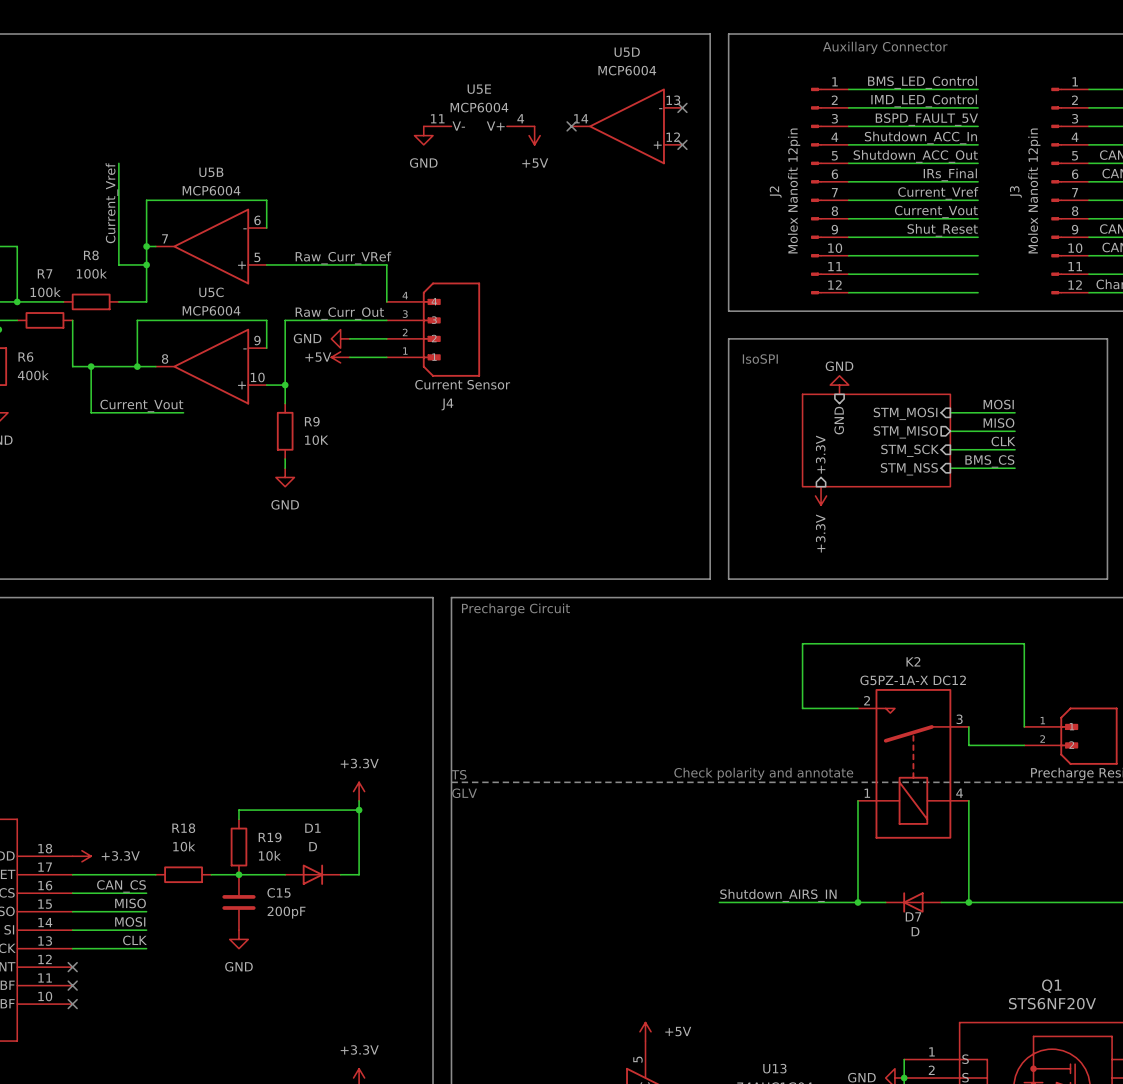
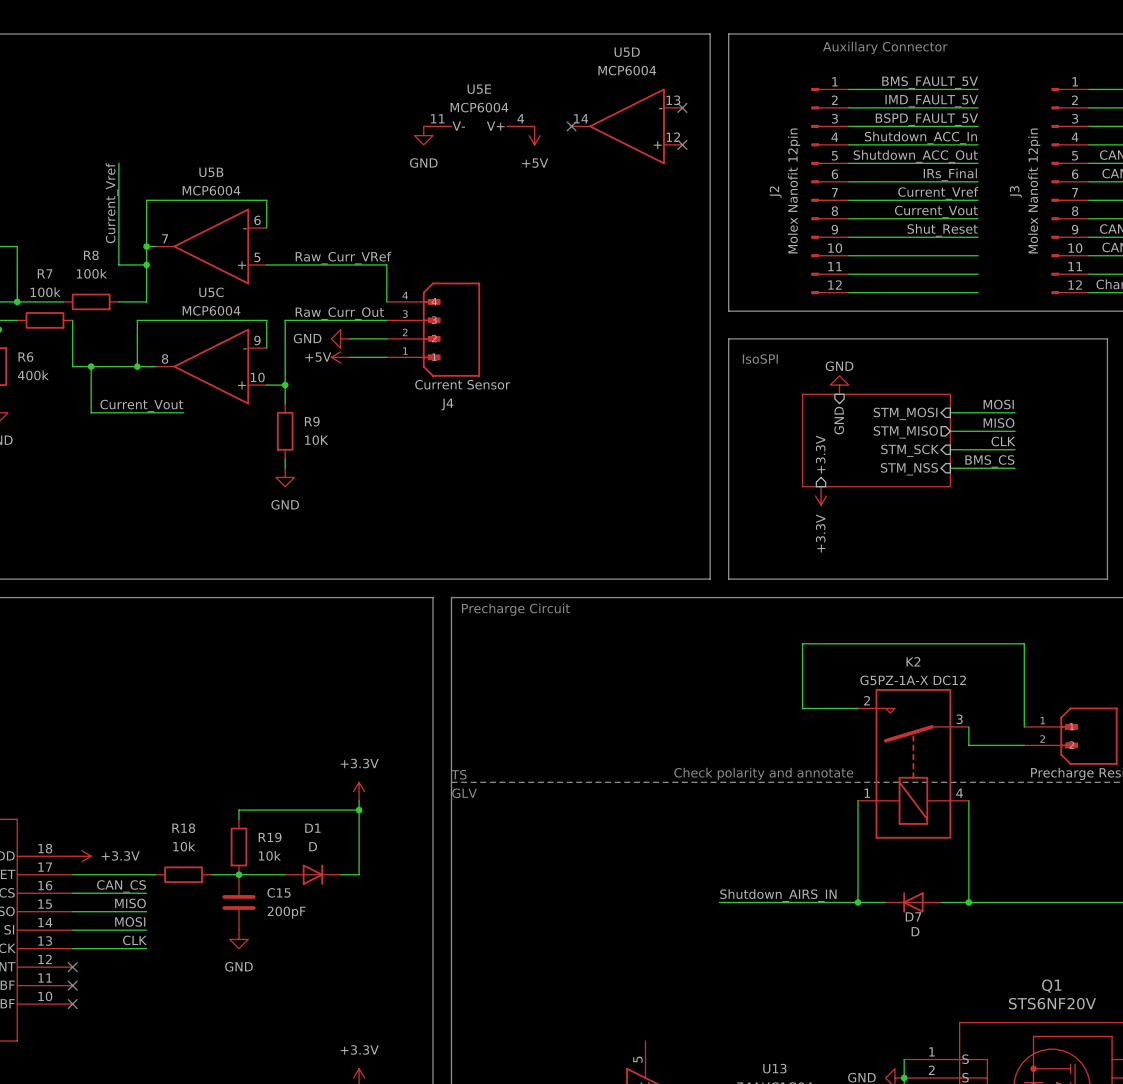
label: BMS_LED_Control (922, 82) -> BMS_FAULT_5V (930, 82)
label: IMD_LED_Control (924, 100) -> IMD_FAULT_5V (931, 101)
power symbol: +5V (645, 1031) -> none

